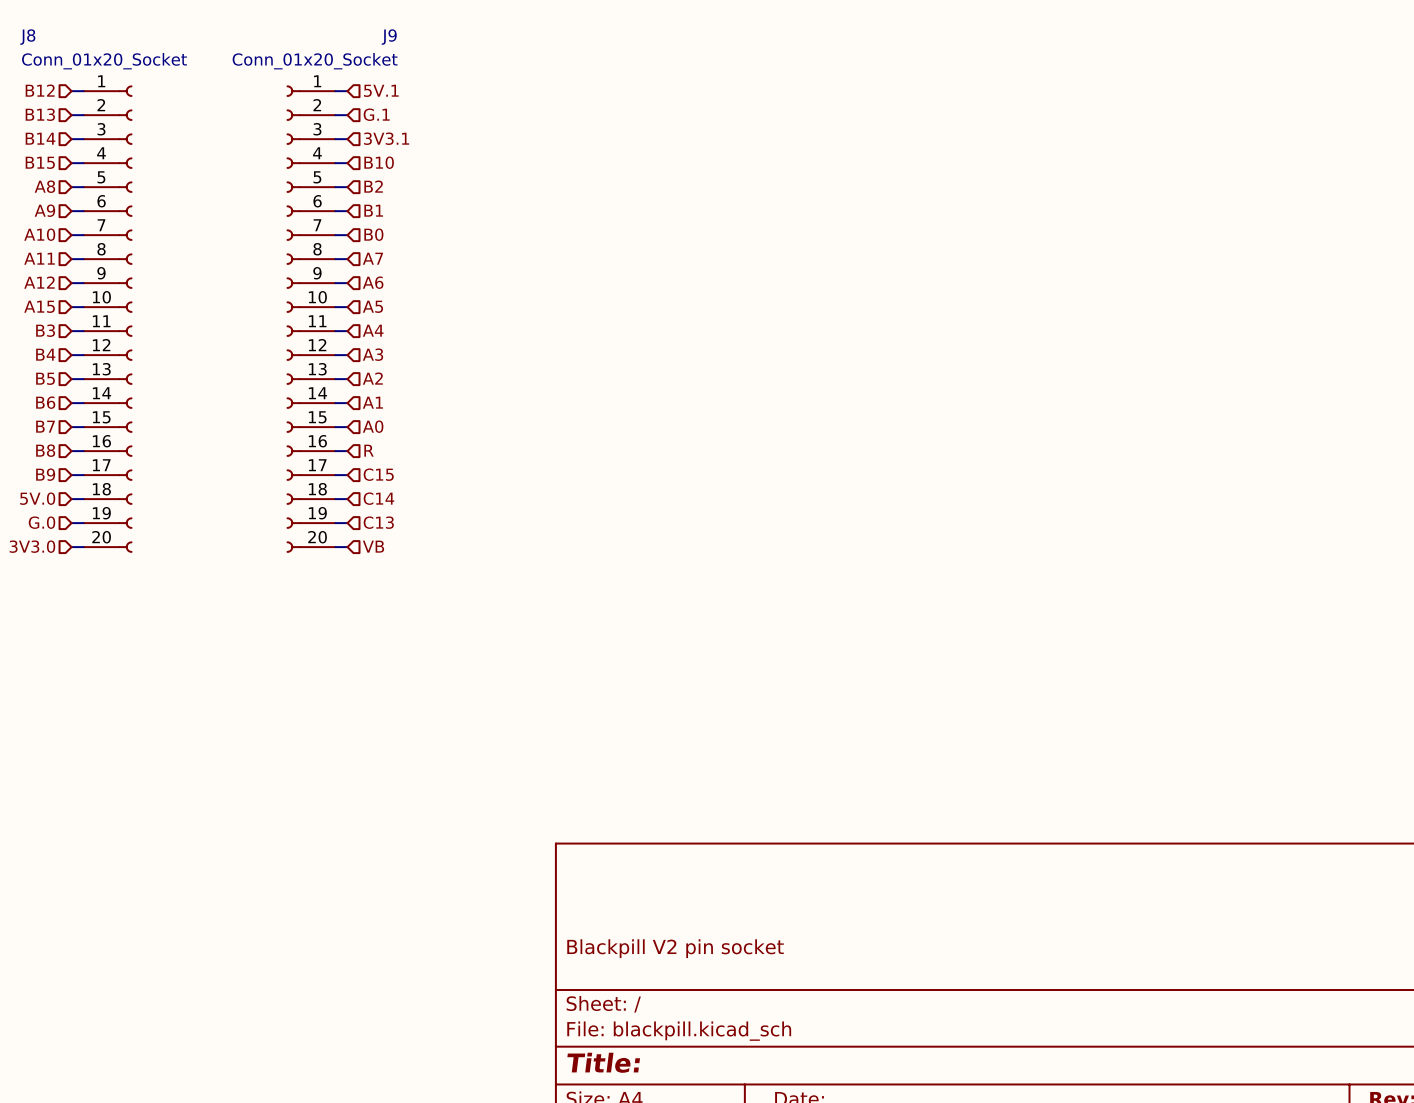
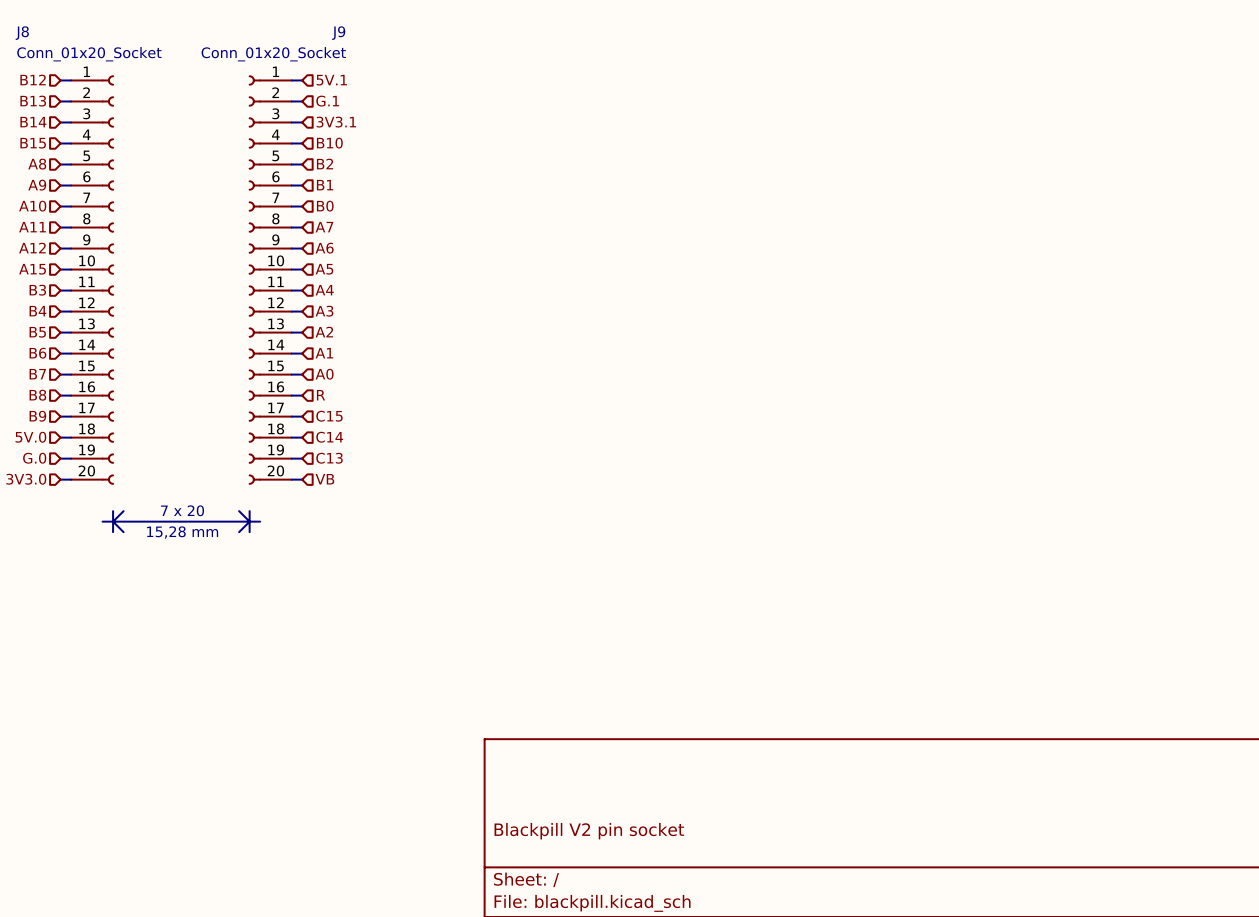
text: none -> 7 x 20 (182, 510)
line: none -> (113, 511) (113, 532)
line: none -> (123, 511) (113, 521) (123, 532)
line: none -> (239, 511) (249, 521) (239, 532)
line: none -> (249, 511) (249, 532)
line: none -> (102, 521) (260, 521)
text: none -> 15,28 mm (182, 532)

